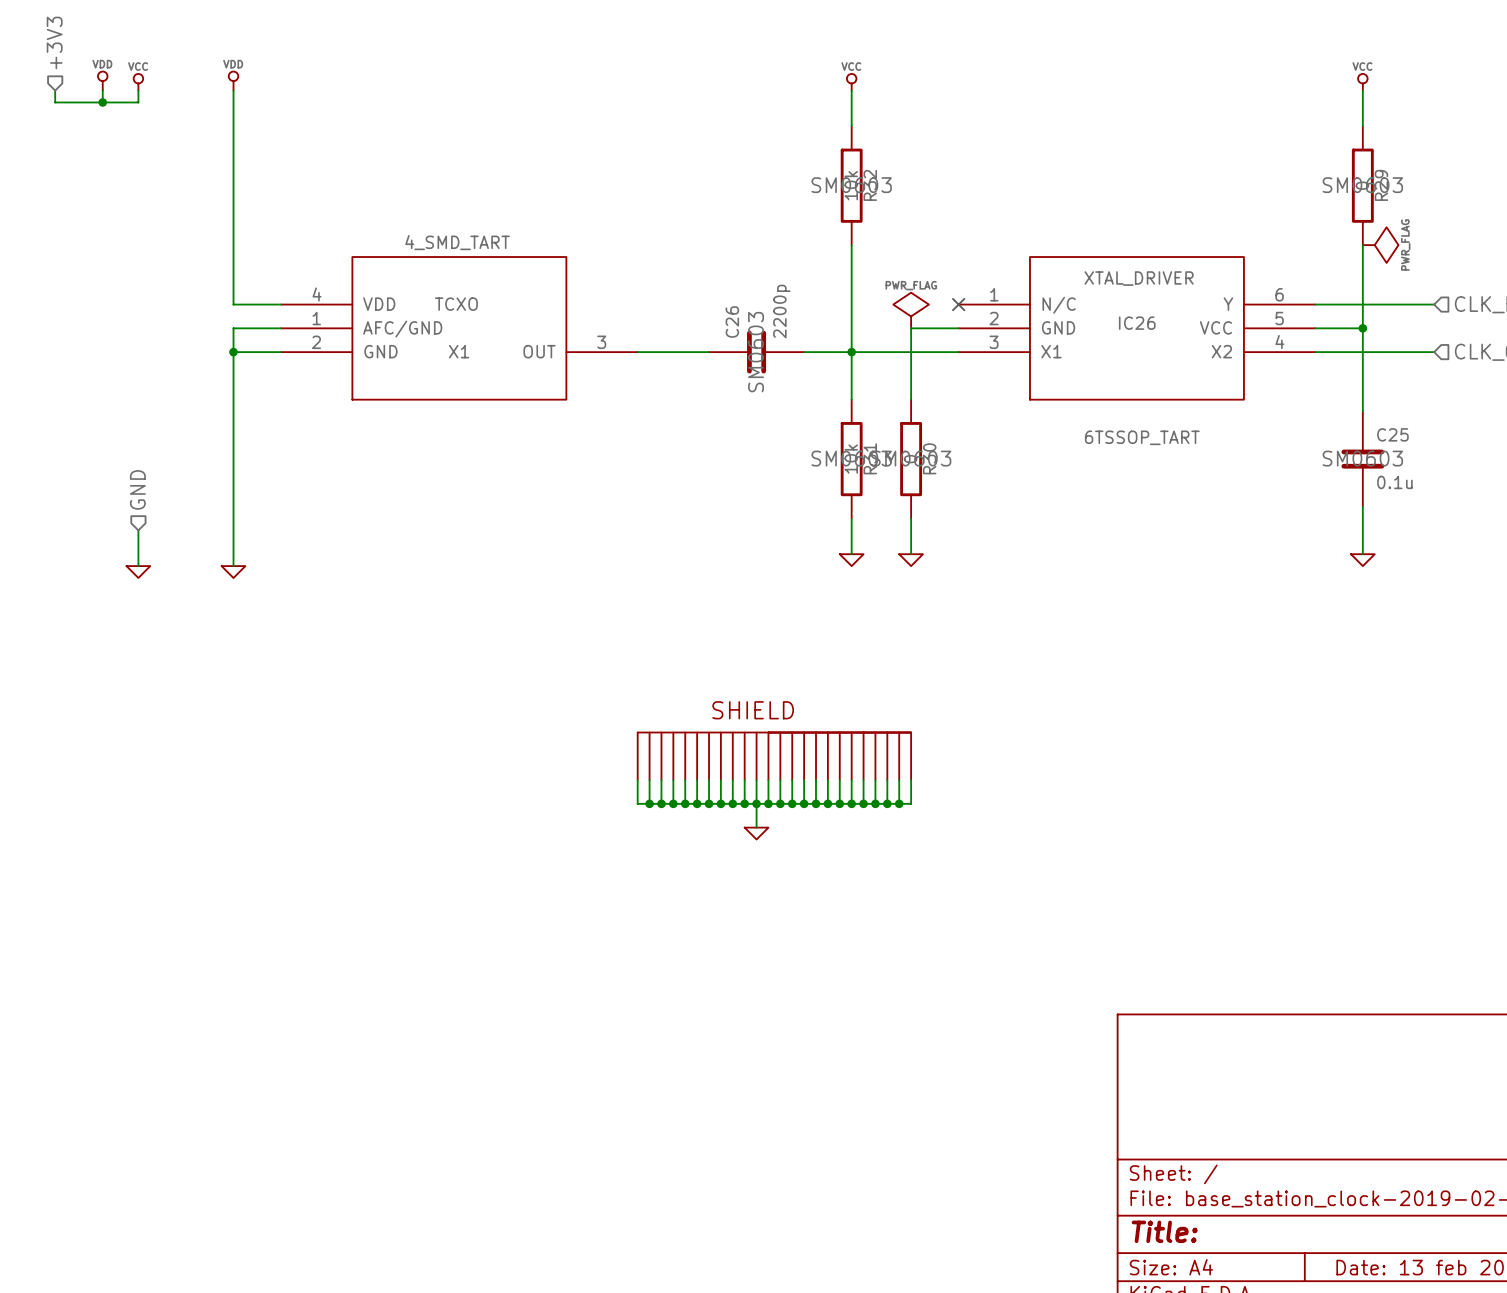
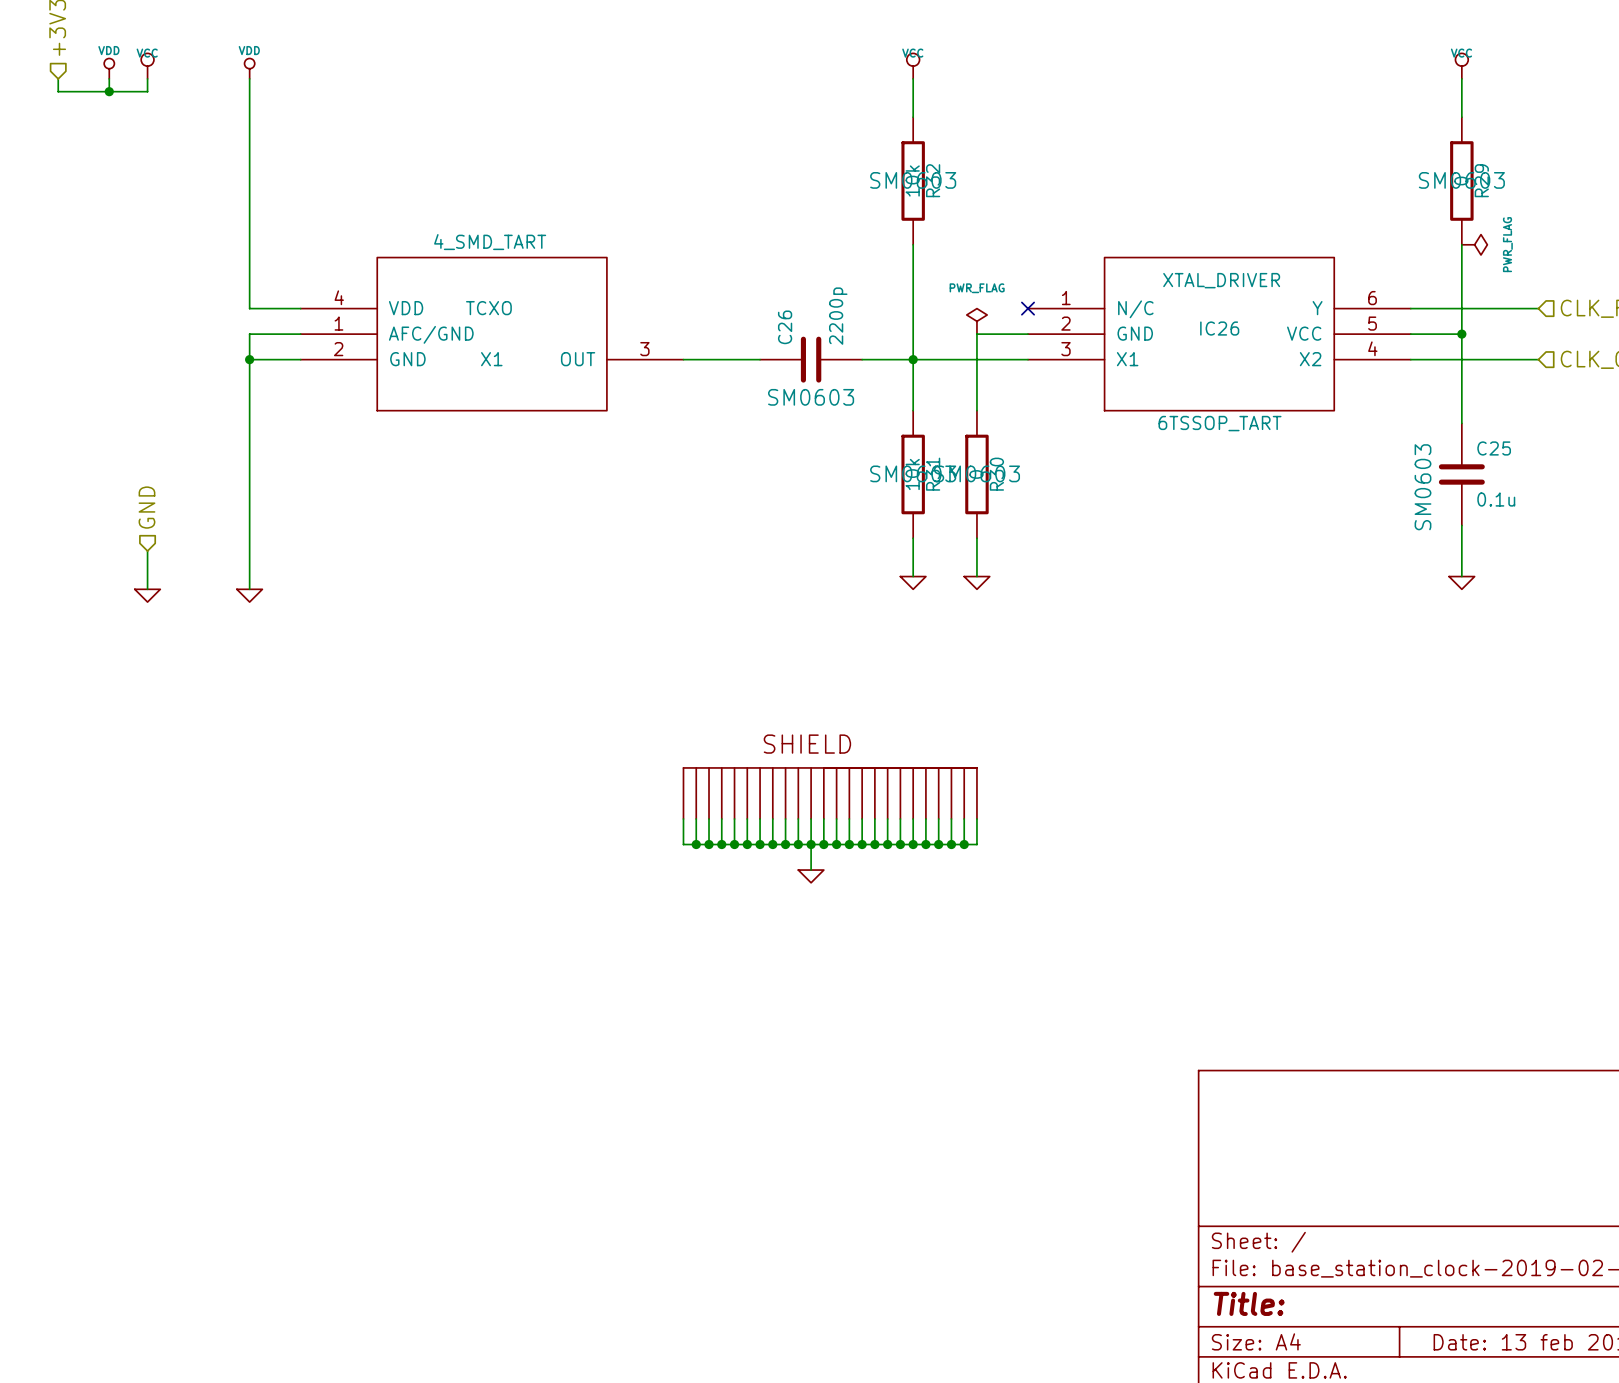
power symbol shape: [133, 73, 144, 91] -> [141, 53, 154, 79]
power symbol shape: [846, 73, 857, 91] -> [906, 53, 920, 79]
power symbol shape: [1358, 73, 1368, 91] -> [1455, 53, 1469, 79]
power symbol shape: [1362, 227, 1399, 263] -> [1461, 234, 1488, 256]
power symbol shape: [893, 292, 929, 329] -> [966, 308, 988, 335]
C26 text rotation: 0° (756, 352) -> 90° clockwise (811, 397)
IC26 text position: 6TSSOP_TART (1142, 437) -> 6TSSOP_TART (1220, 423)
C25 text rotation: 0° (1362, 458) -> 90° counterclockwise (1423, 487)

